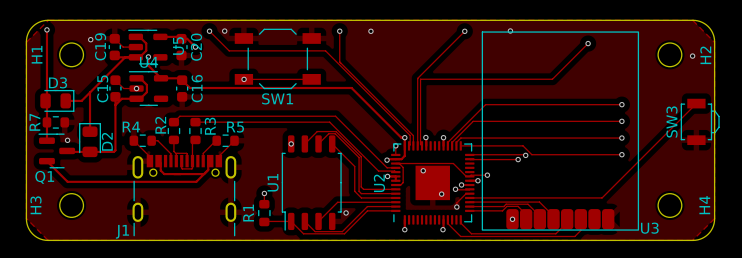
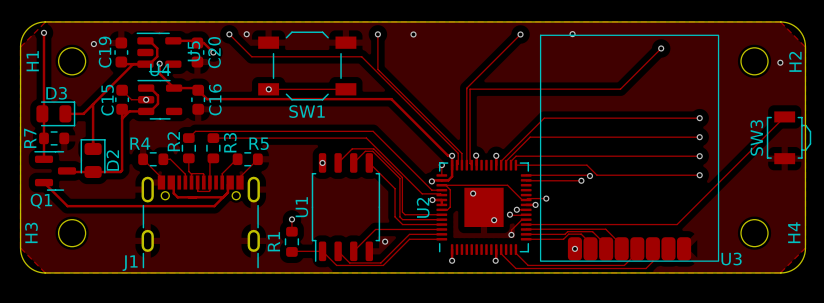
track: (114, 38) (123, 47) (135, 47) -> none
via: (67, 140) -> none

